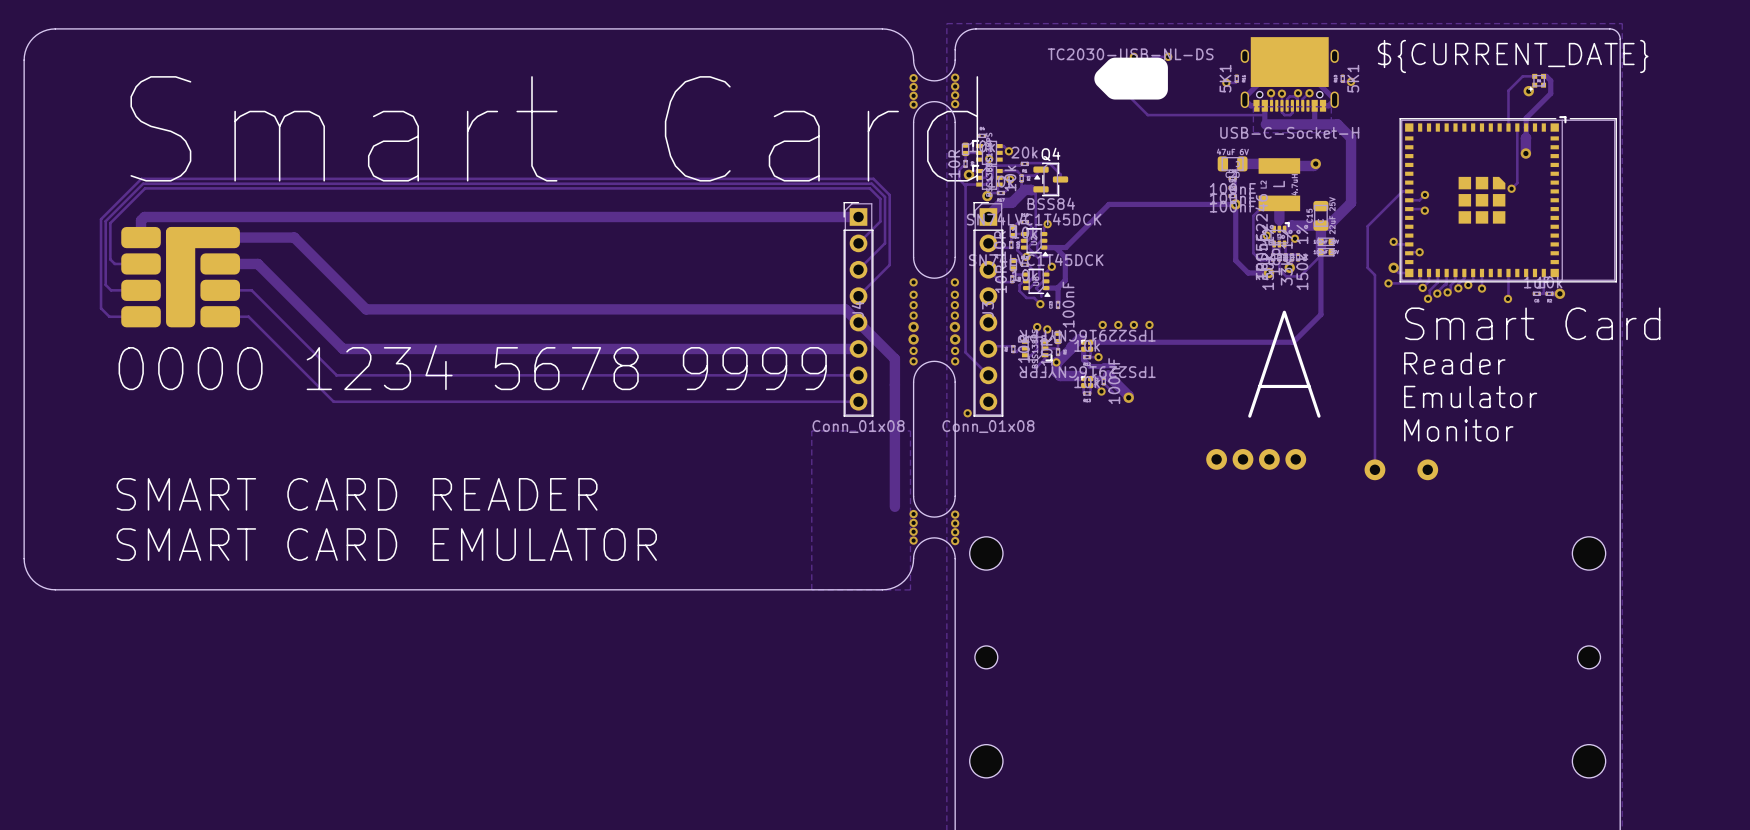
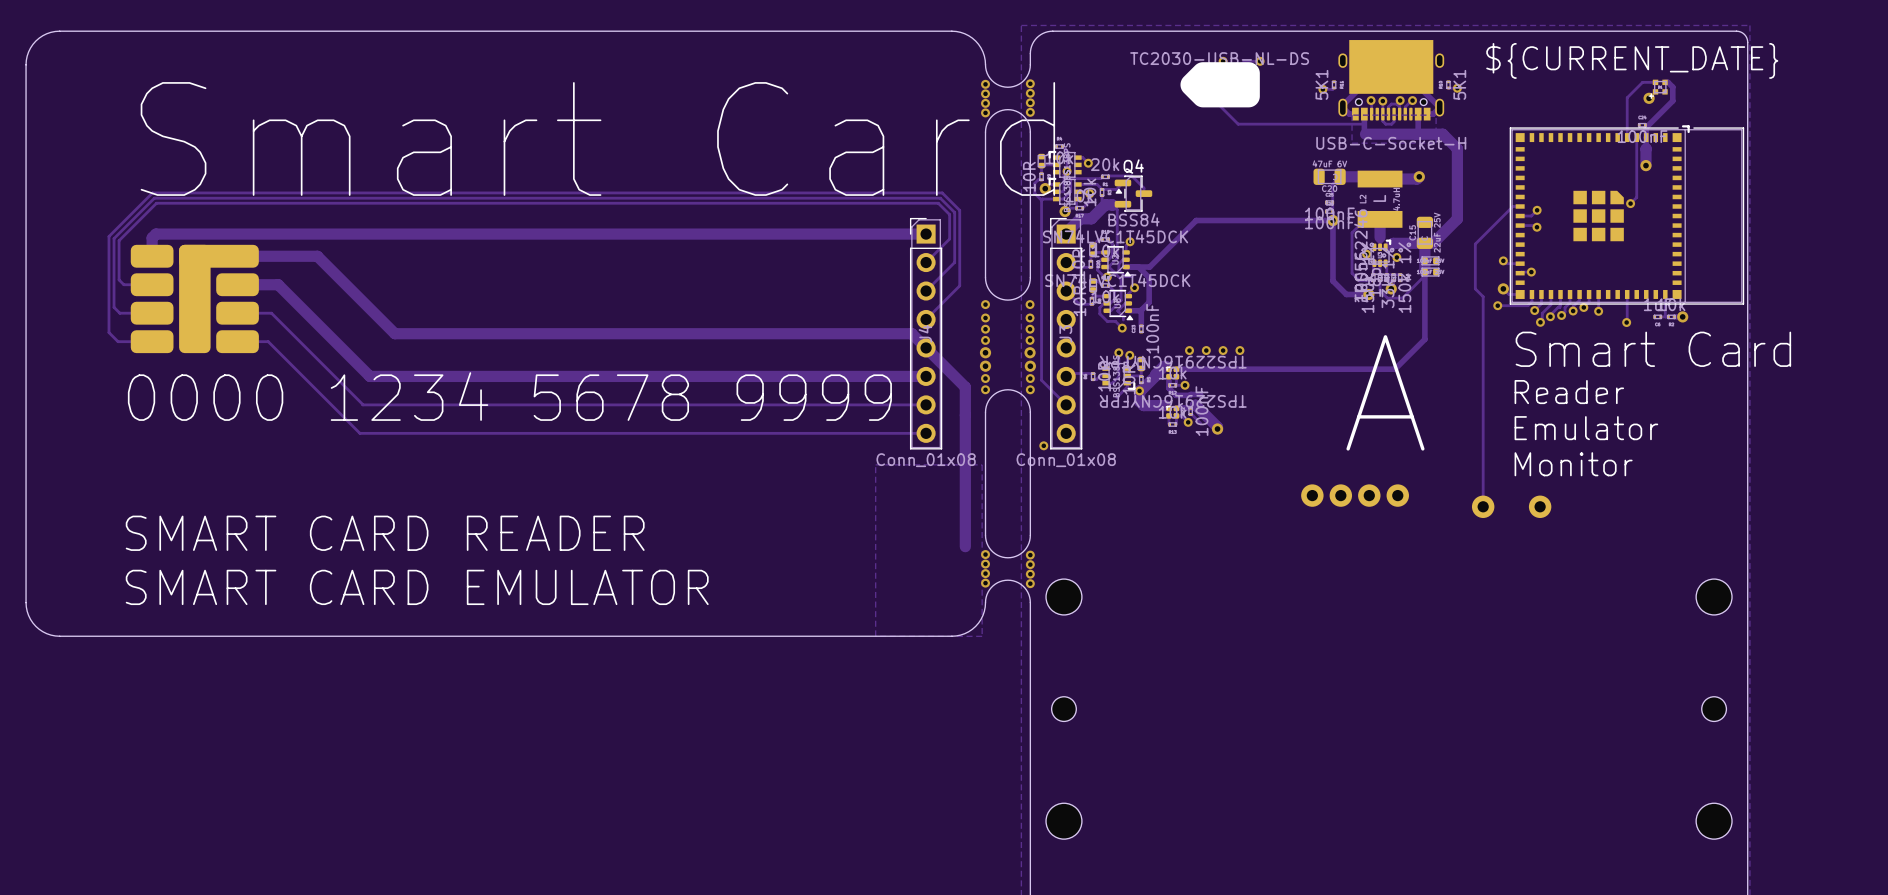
part position: (1232, 178) -> (1642, 125)

